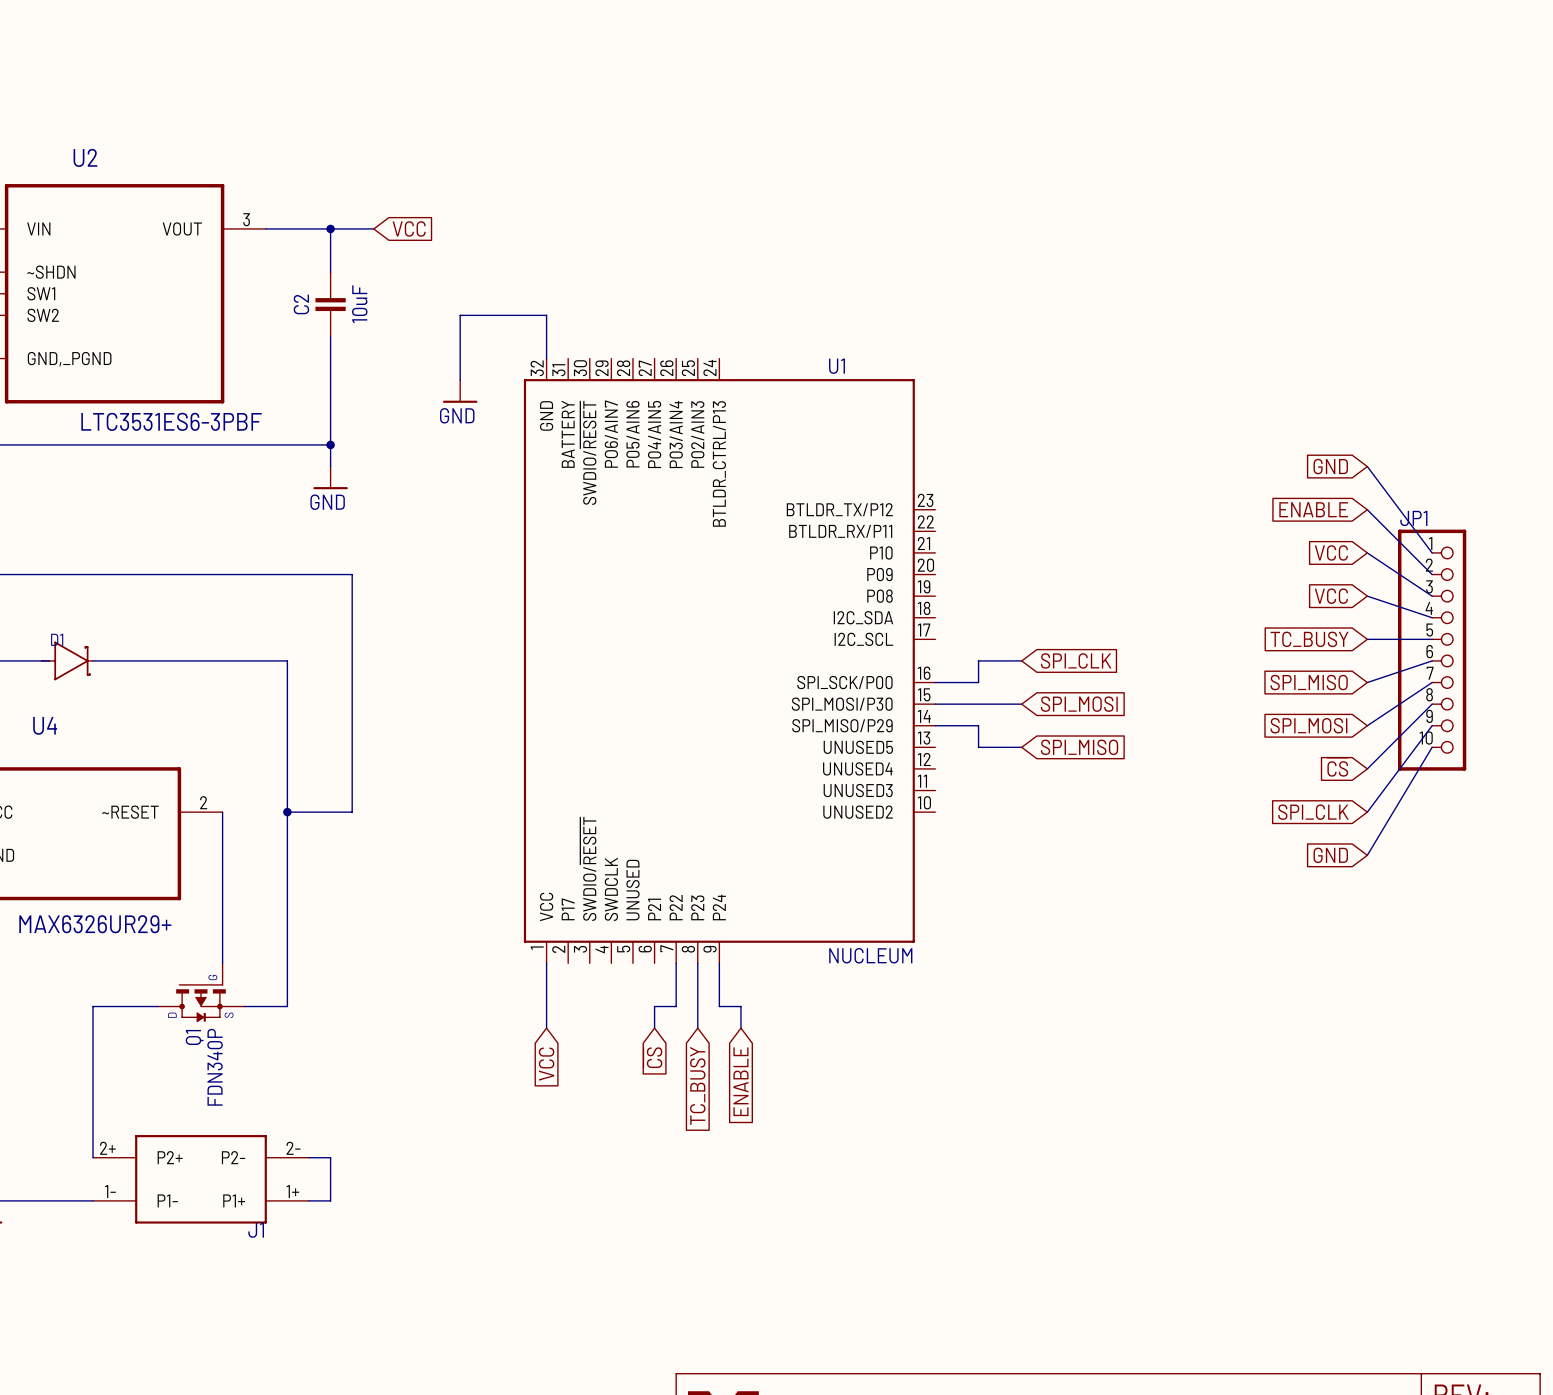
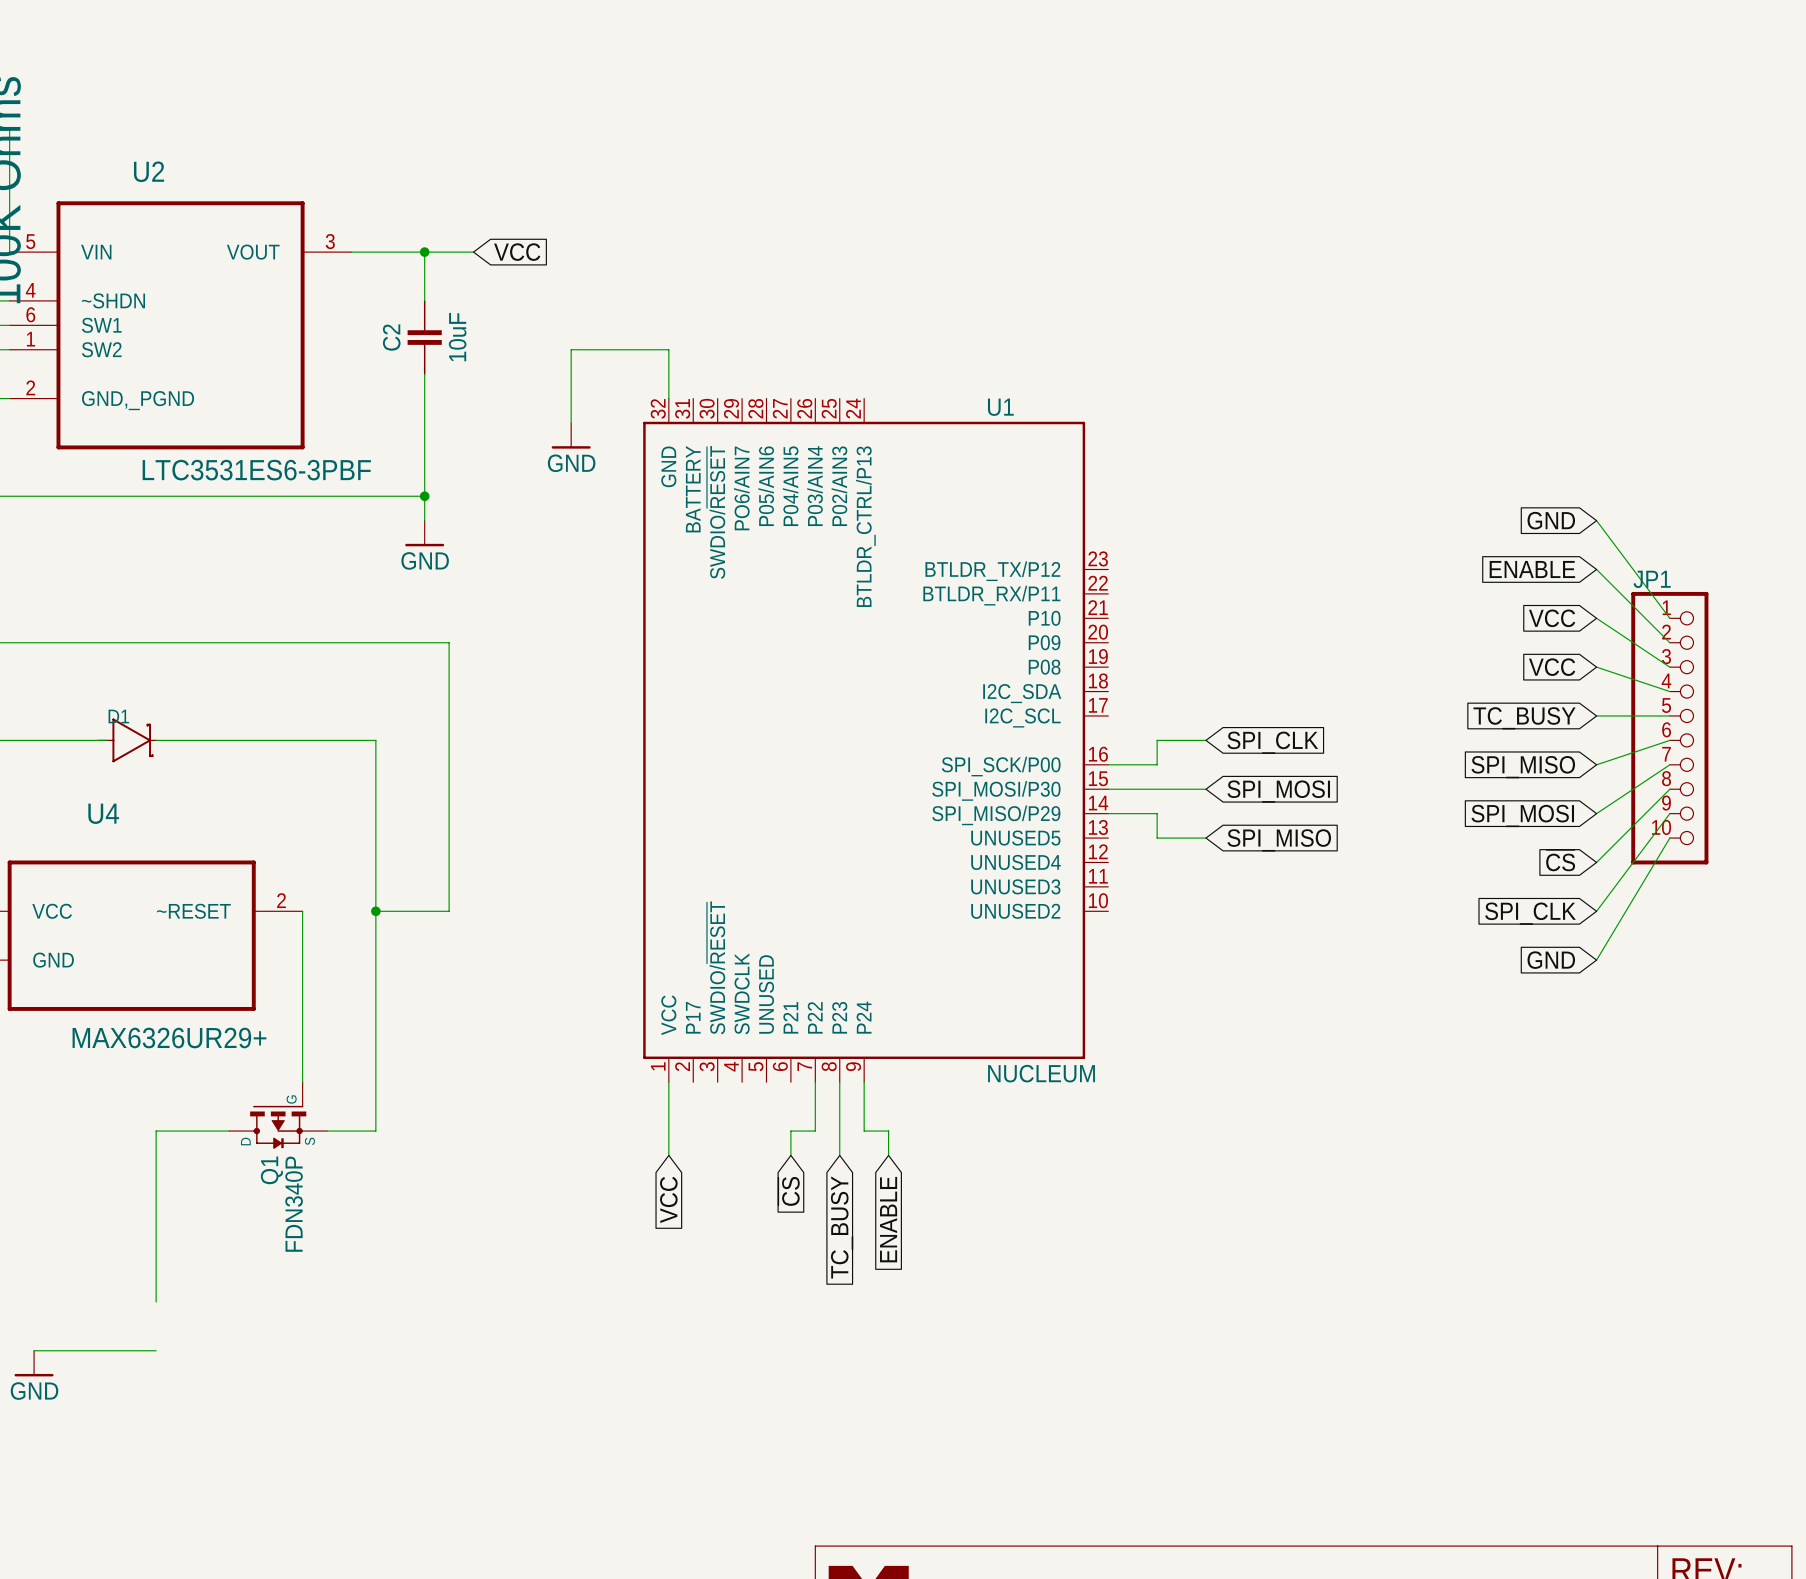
wire: (308, 1157) (330, 1157) (330, 1200) (308, 1200) -> none
J1: (200, 1179) -> none

